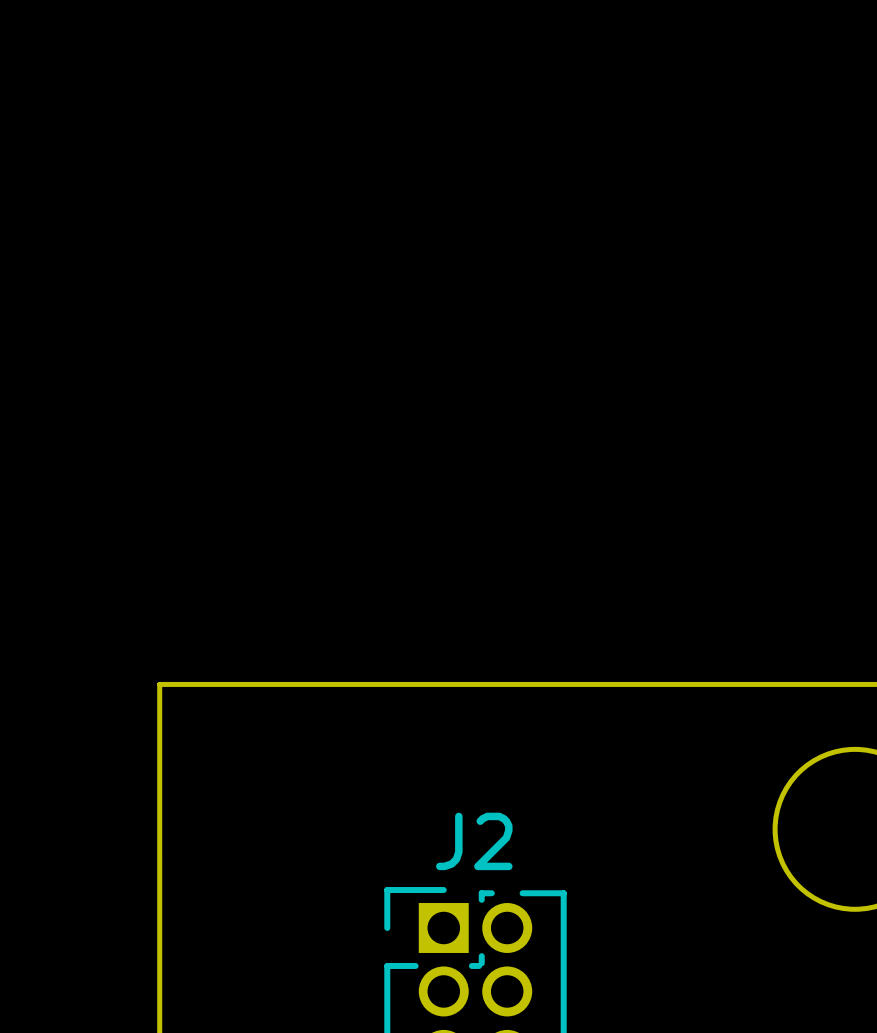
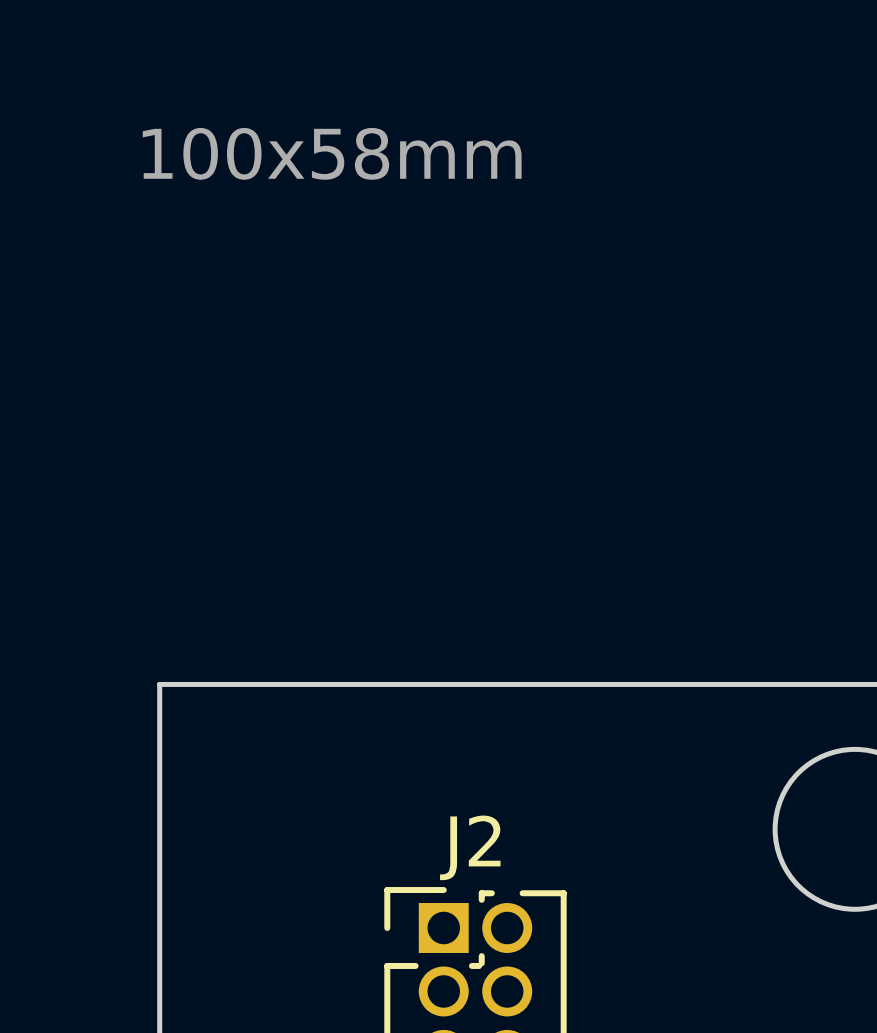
text: none -> 100x58mm (332, 153)

